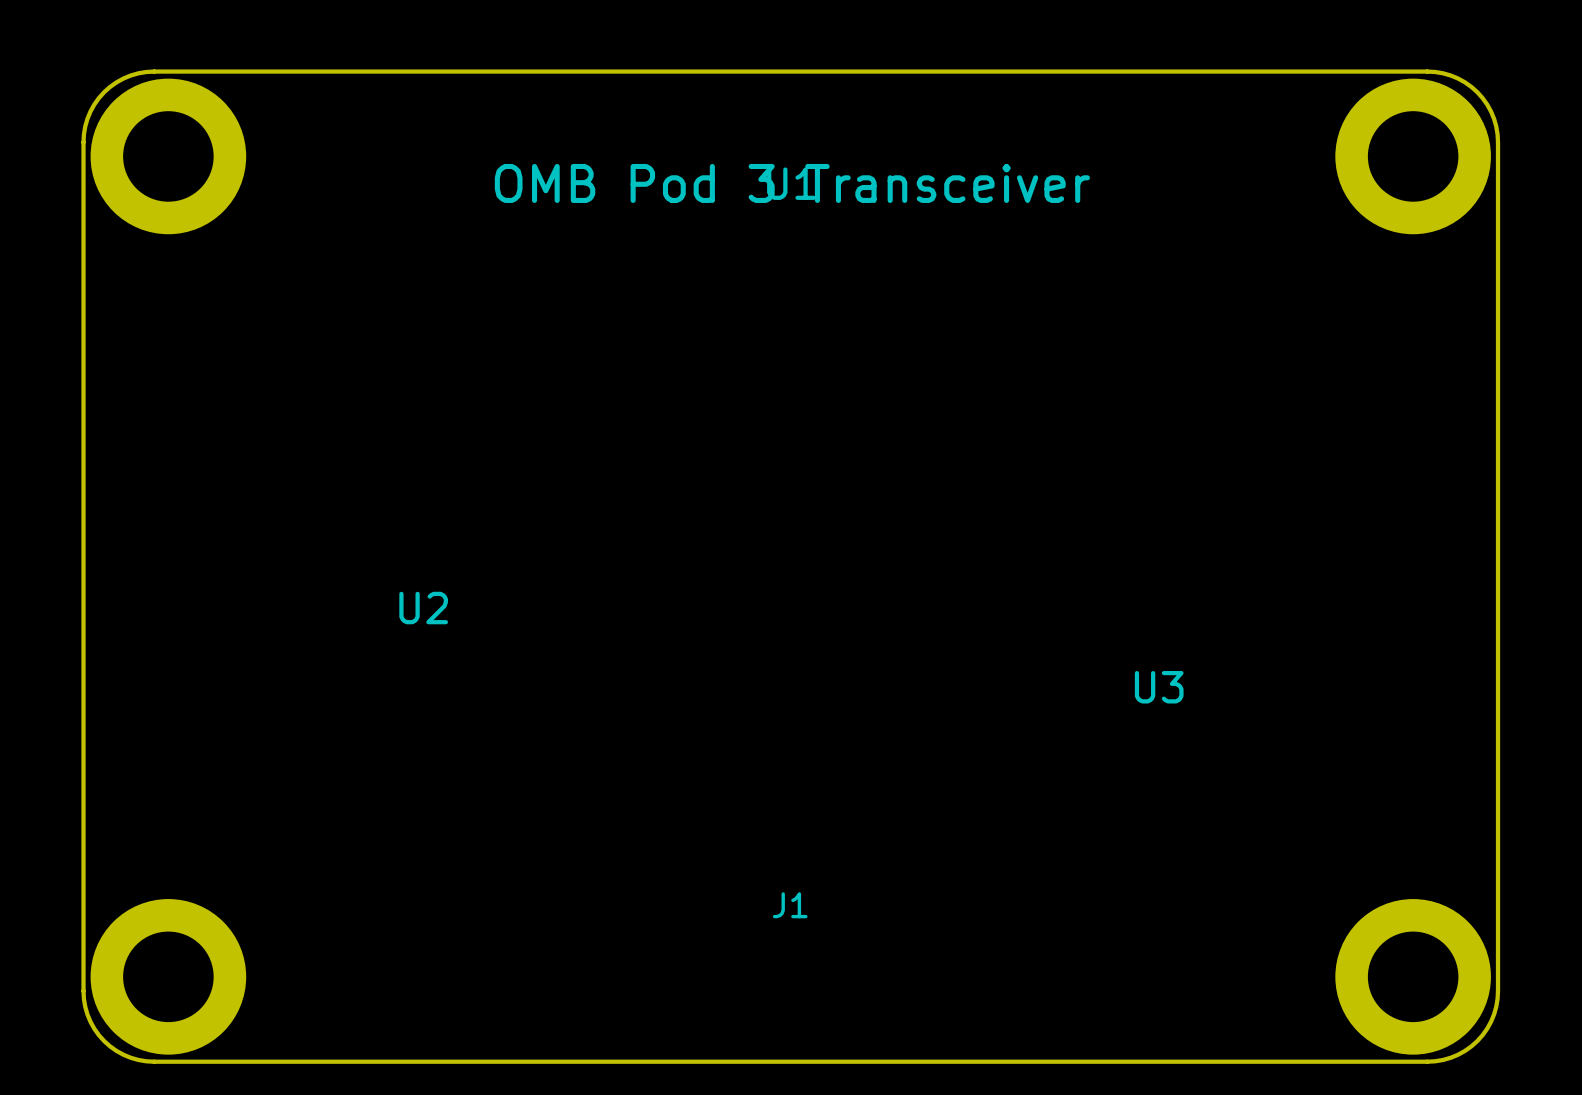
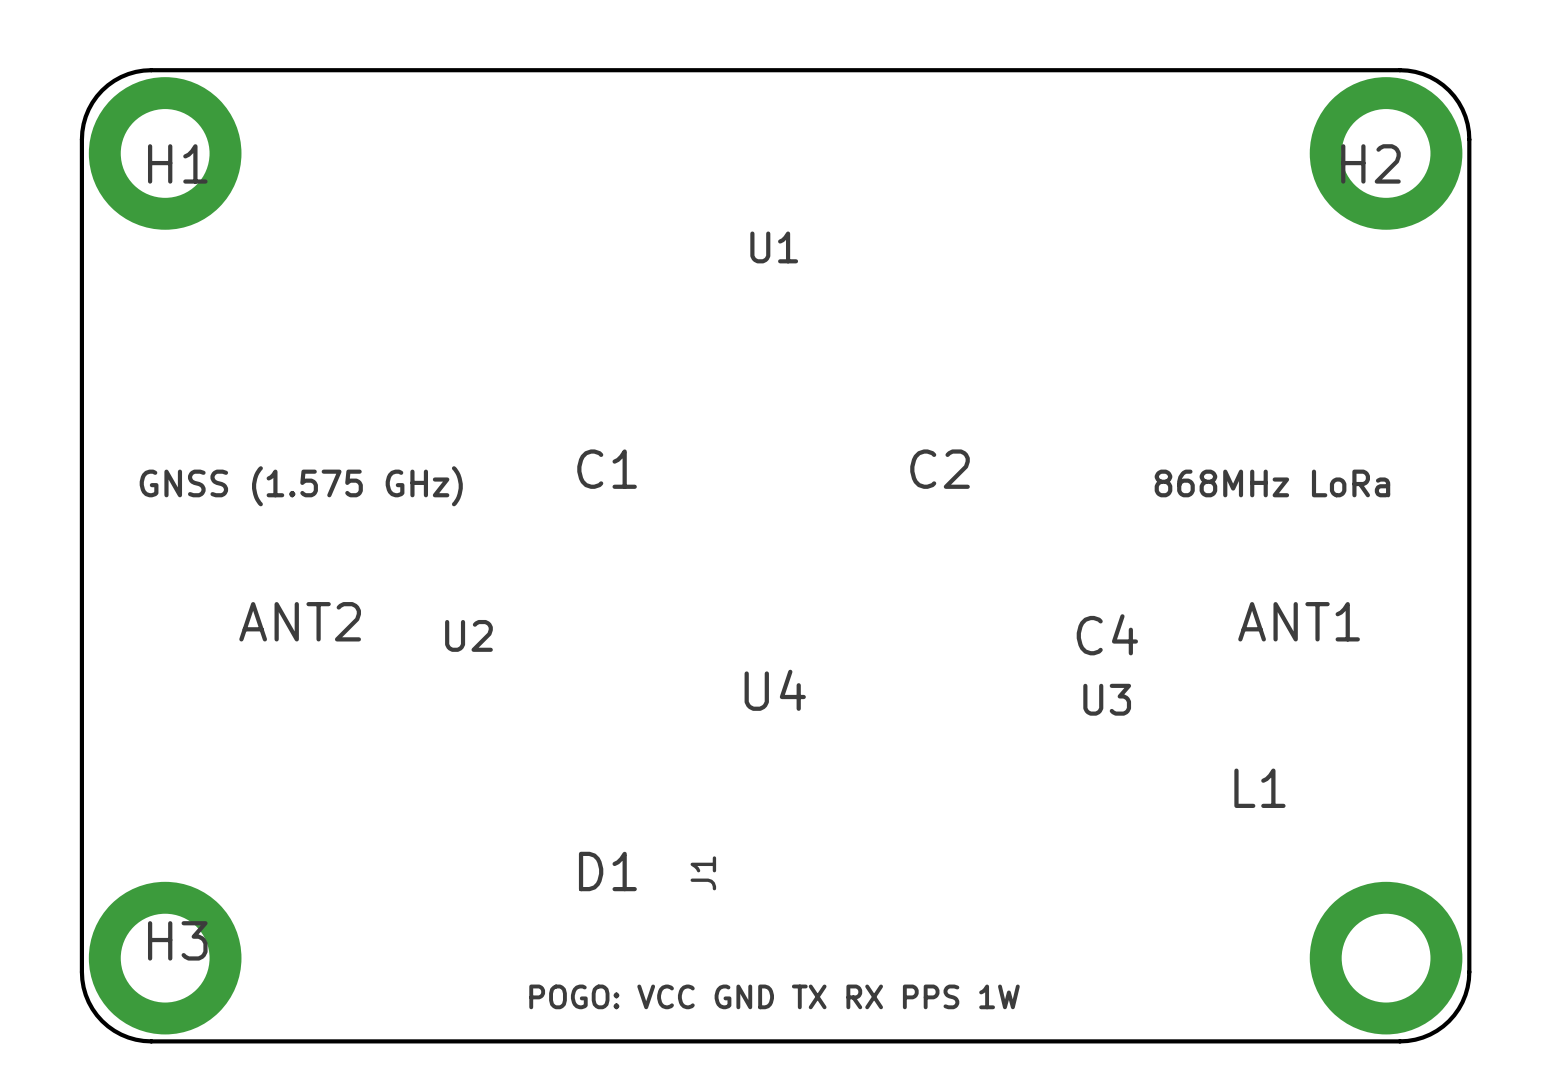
H1: none -> (177, 163)
H2: none -> (1370, 163)
U1 position: (791, 183) -> (774, 247)
text: OMB Pod 3 Transceiver (792, 183) -> none
C1: none -> (607, 469)
C2: none -> (940, 469)
text: none -> 868MHz LoRa (1272, 483)
text: none -> GNSS (1.575 GHz) (301, 486)
U2 position: (423, 608) -> (468, 635)
ANT2: none -> (300, 621)
ANT1: none -> (1299, 621)
C4: none -> (1107, 634)
U3 position: (1159, 687) -> (1107, 699)
U4: none -> (775, 690)
L1: none -> (1259, 788)
D1: none -> (607, 871)
J1 position: (790, 905) -> (703, 873)
J1 name rotation: 0° (790, 905) -> 90° counterclockwise (703, 873)
H3: none -> (177, 940)
text: none -> POGO: VCC GND TX RX PPS 1W (774, 996)

